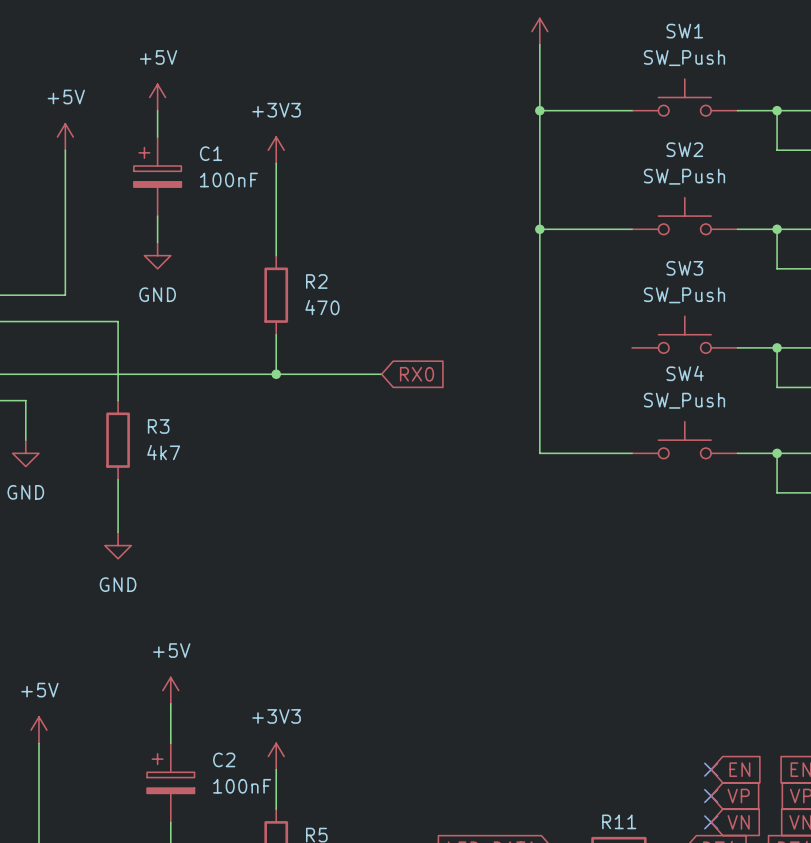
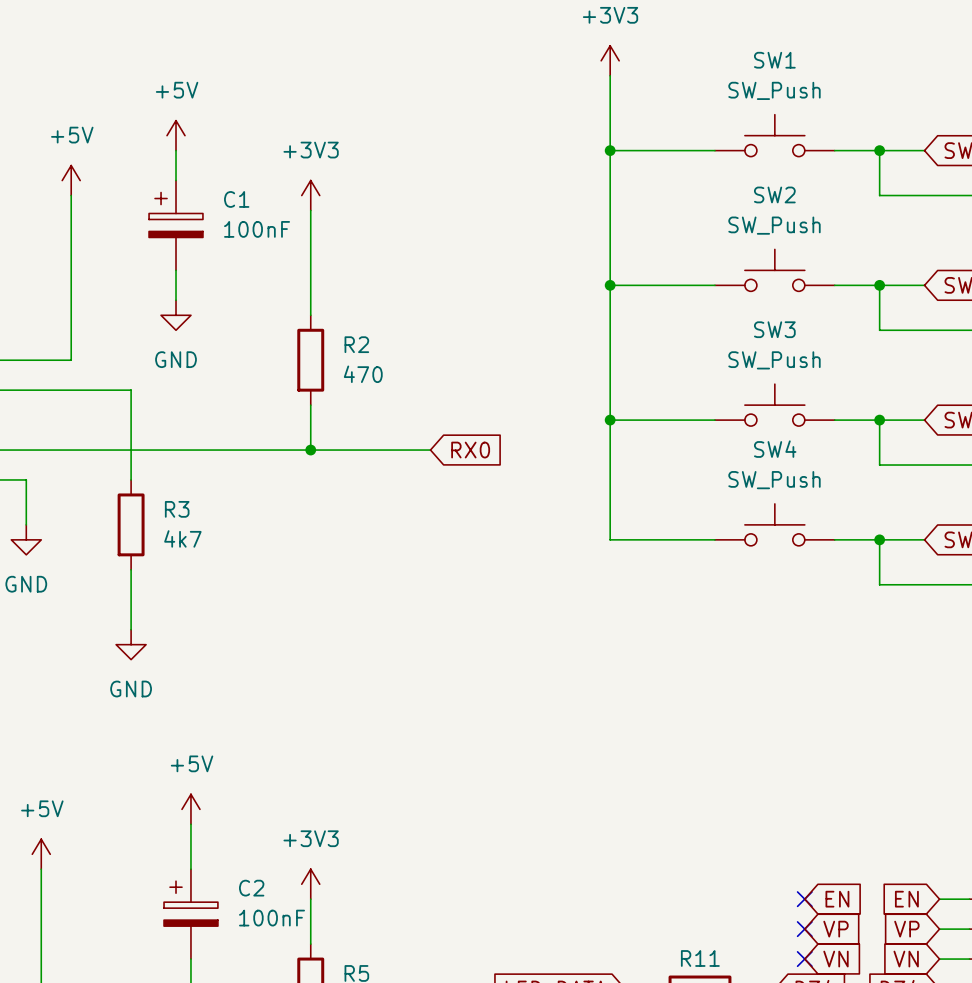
wire: none -> (610, 420) (714, 420)
junction: none -> (610, 420)

